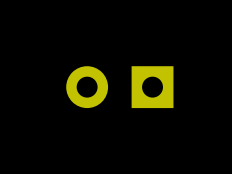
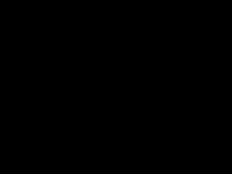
part: (119, 87) -> none

